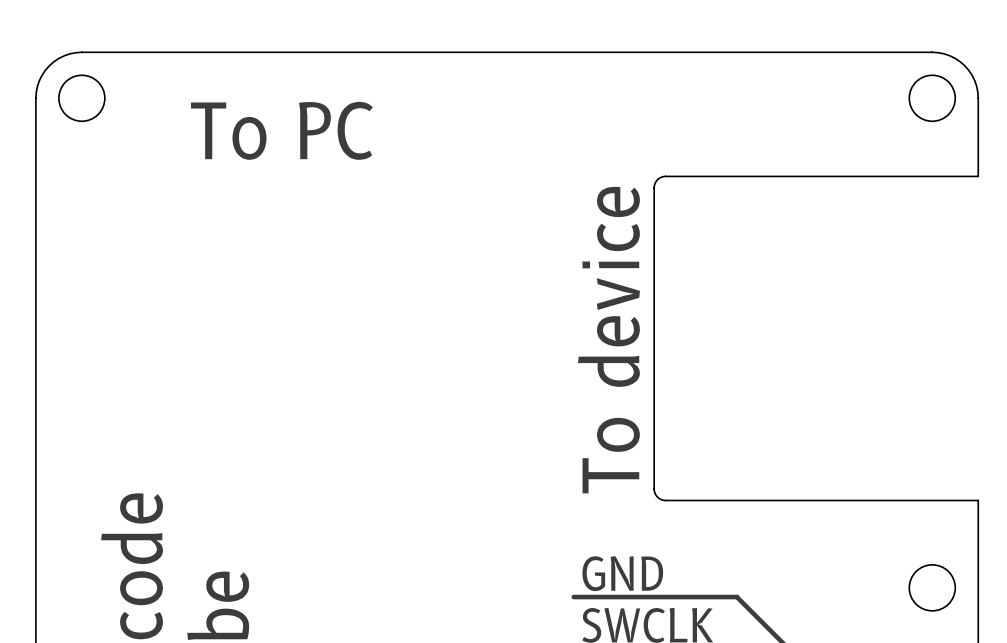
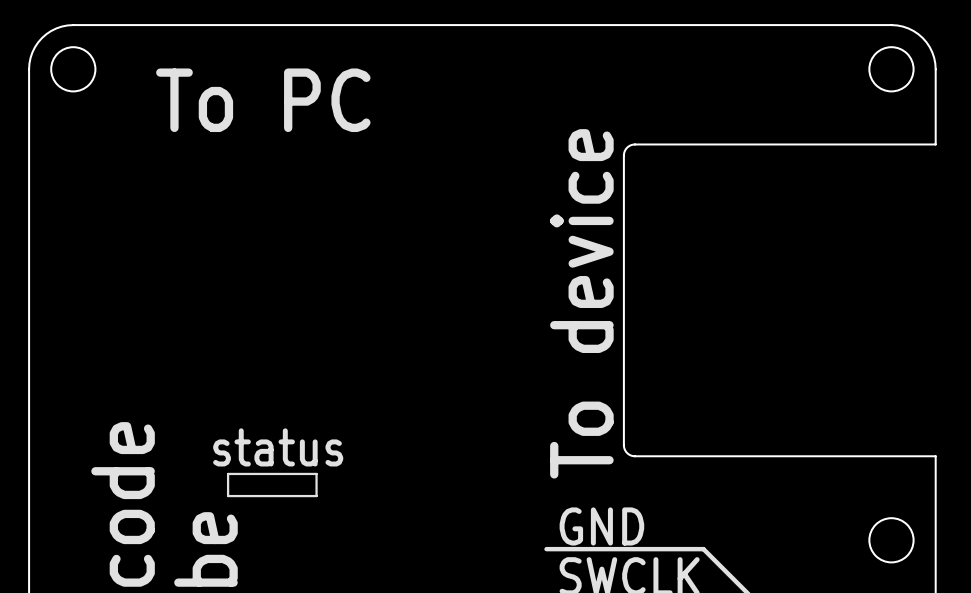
text: none -> status (278, 447)
line: none -> (228, 473) (316, 473) (316, 496) (228, 496) (228, 473)

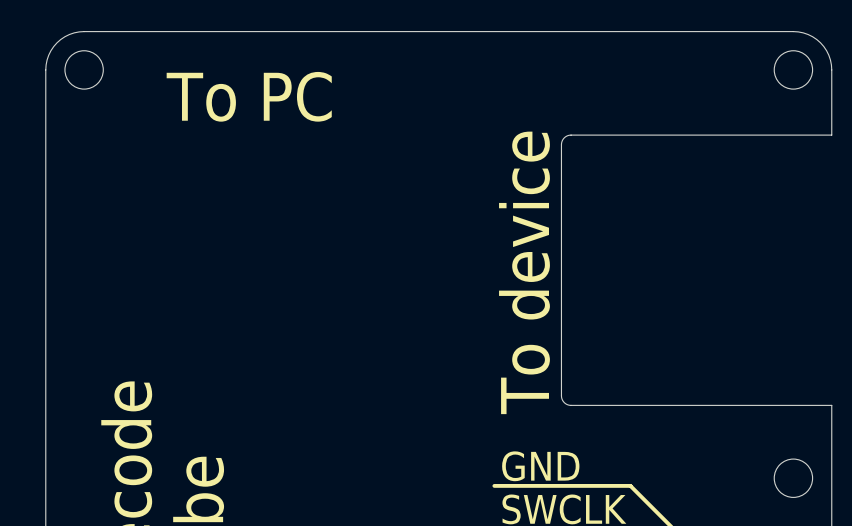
text: status (278, 447) -> none
line: (228, 473) (316, 473) (316, 496) (228, 496) (228, 473) -> none

